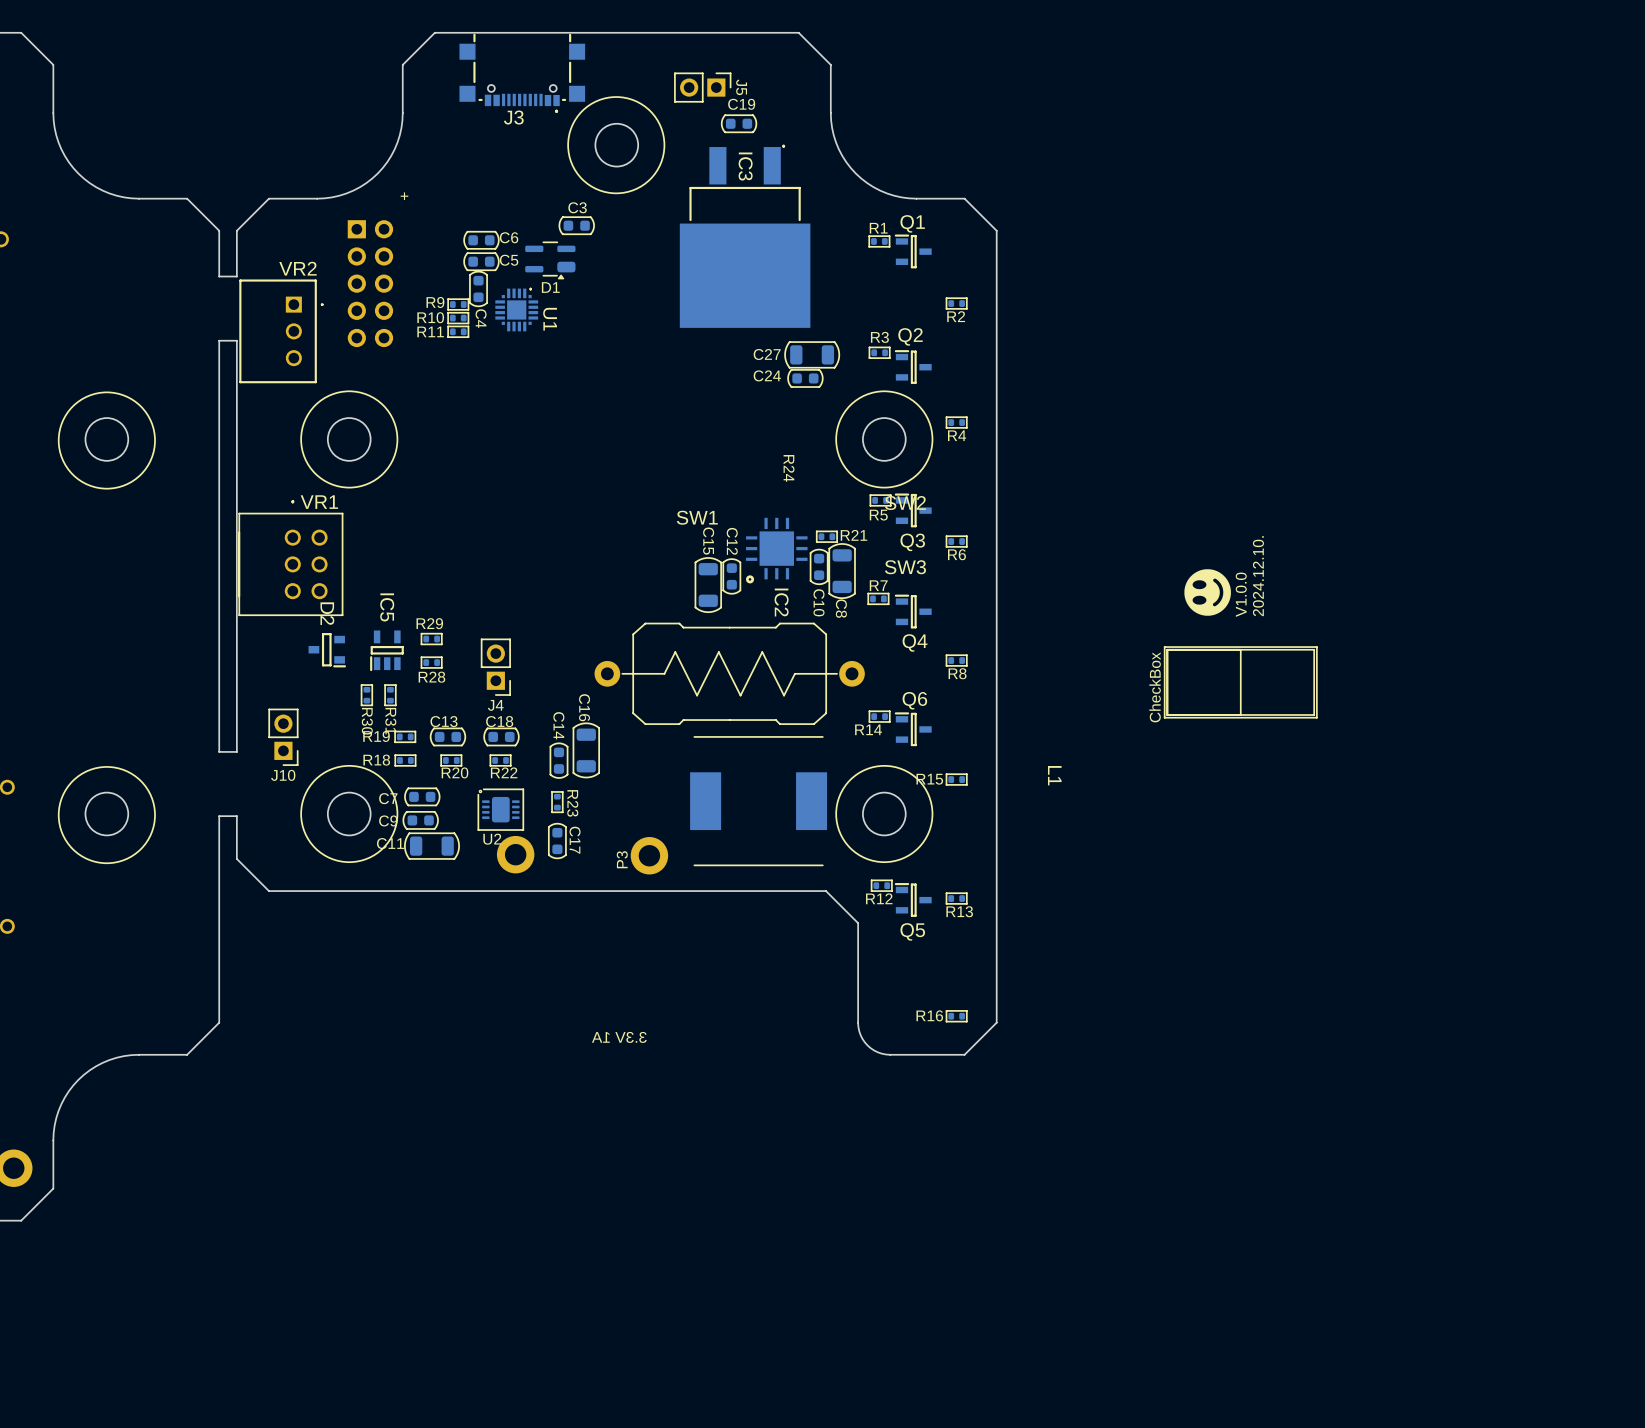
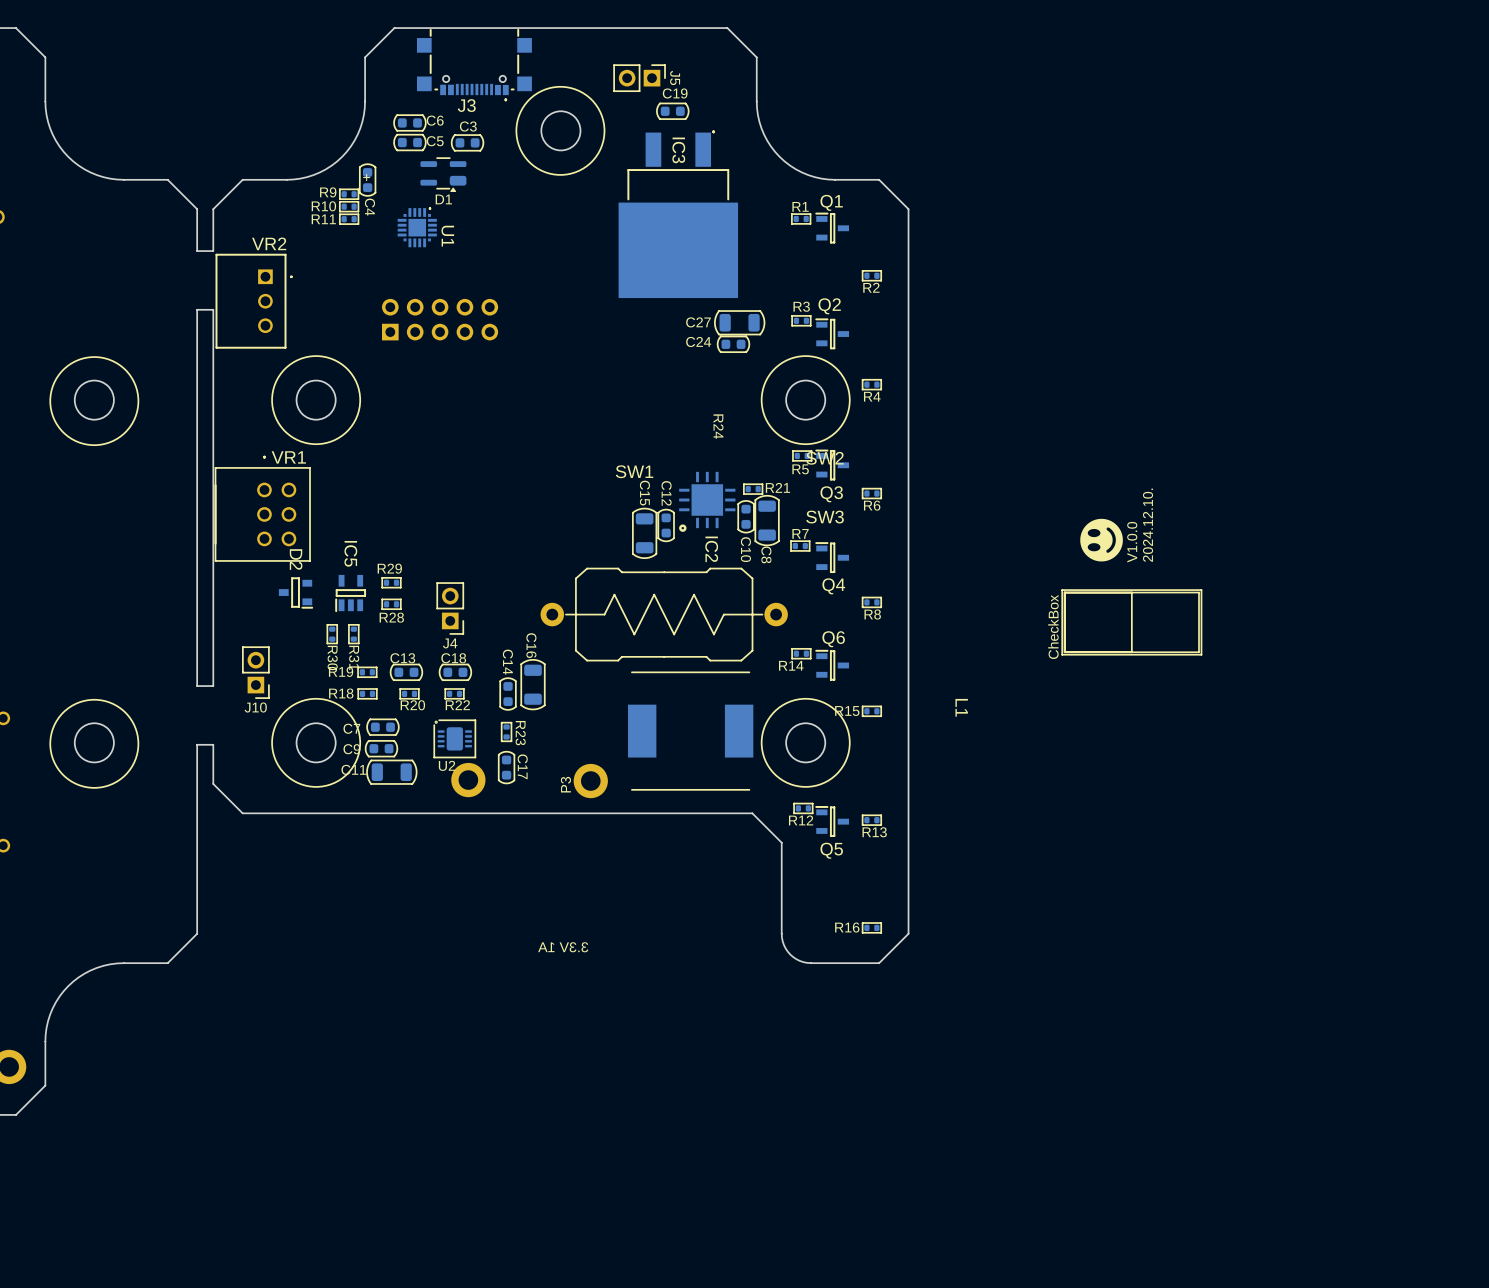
C3 position: (576, 225) -> (467, 142)
C6 position: (481, 240) -> (409, 122)
D1 position: (550, 260) -> (443, 174)
C5 position: (481, 261) -> (409, 142)
part rotation: 0° (370, 283) -> 90° counterclockwise (440, 319)
part position: (370, 283) -> (440, 319)
C4 position: (478, 288) -> (367, 180)
R9 position: (458, 304) -> (349, 194)
U1 position: (516, 309) -> (417, 227)
R10 position: (458, 318) -> (349, 206)
R11 position: (458, 331) -> (349, 219)

